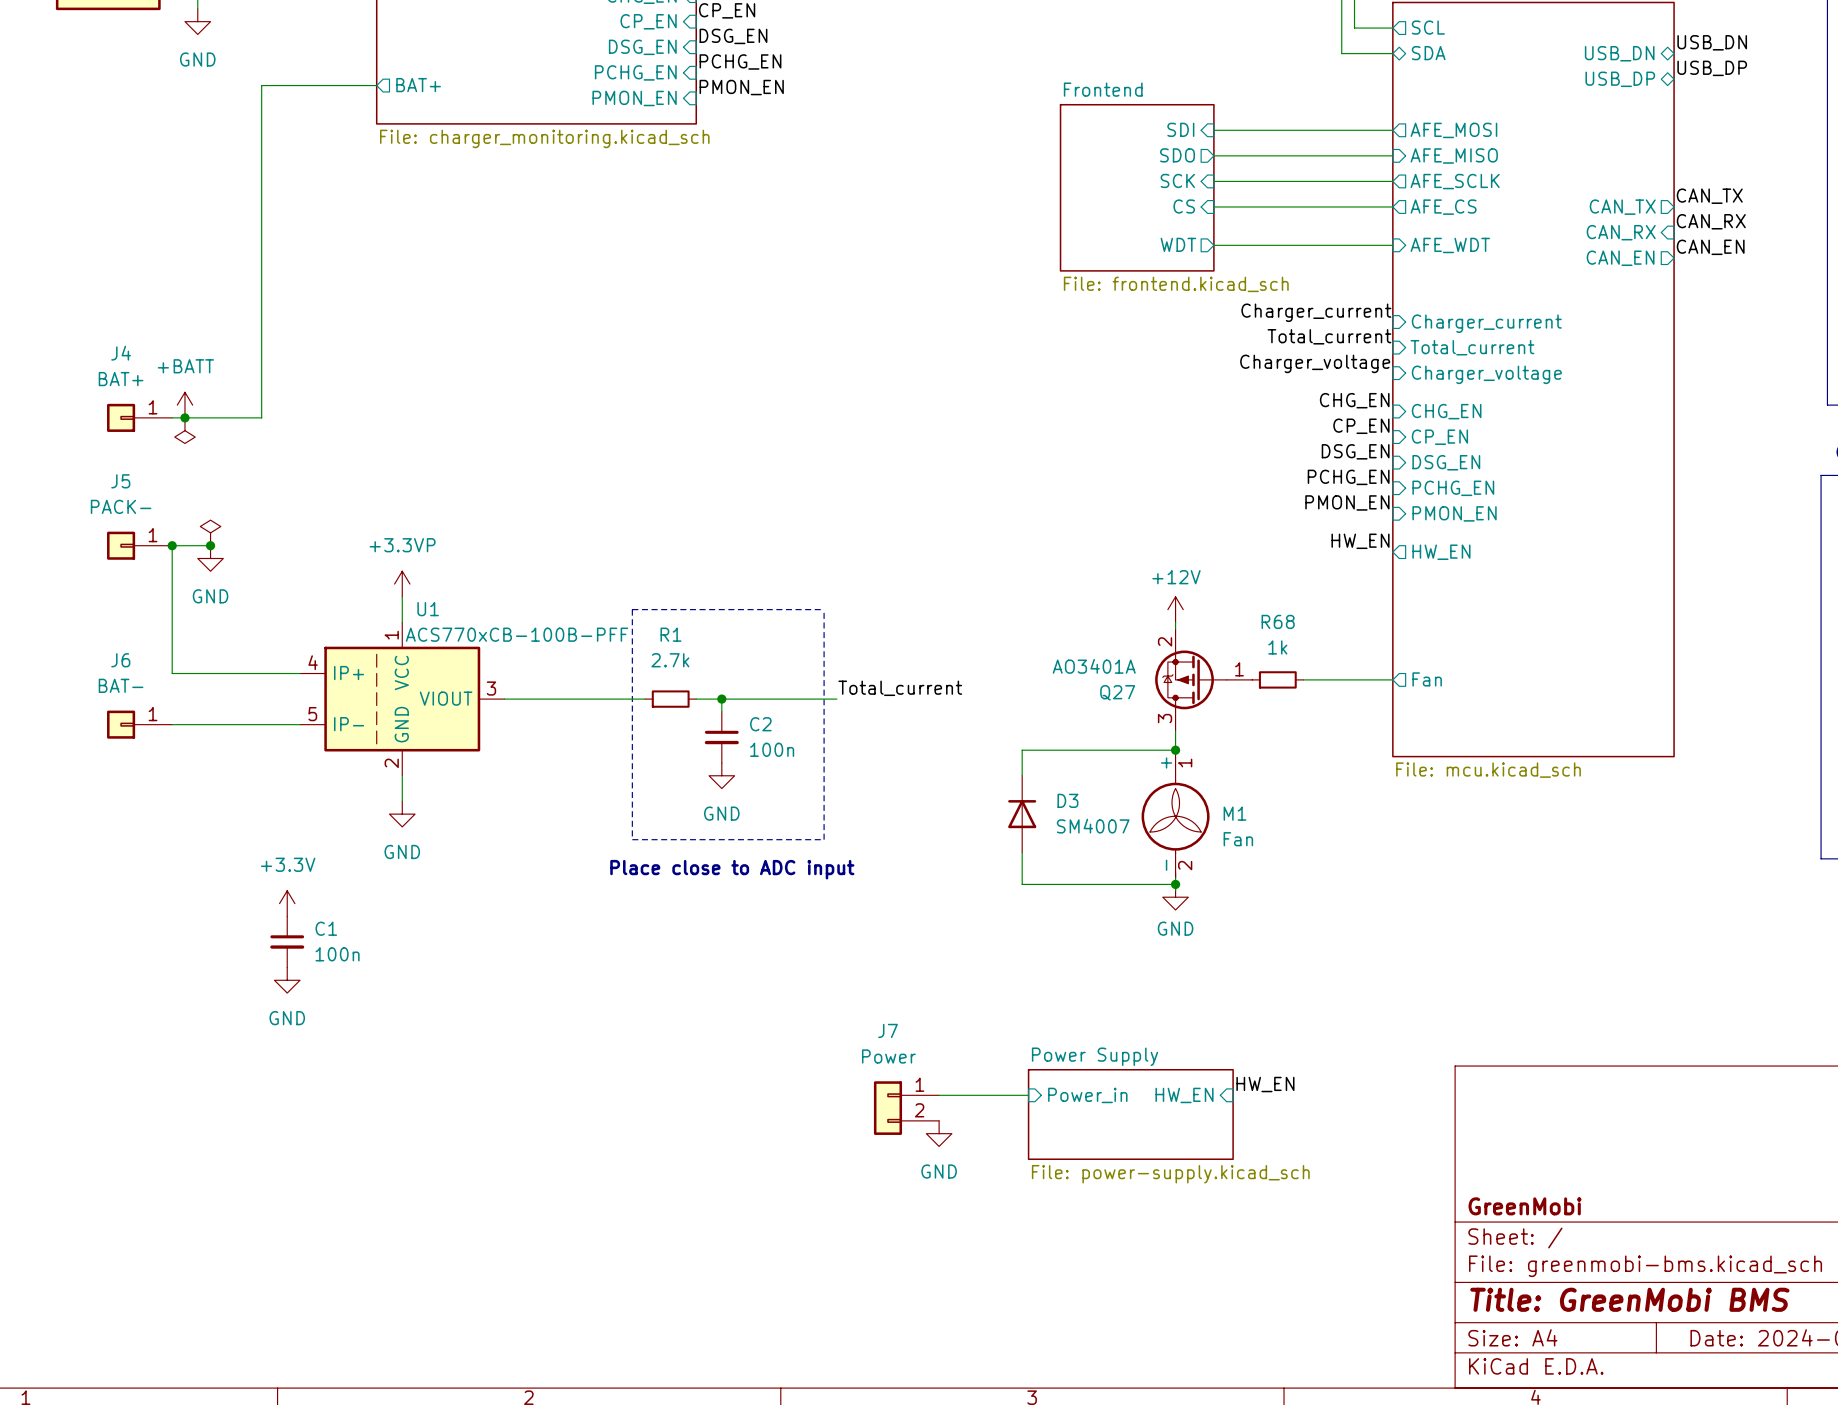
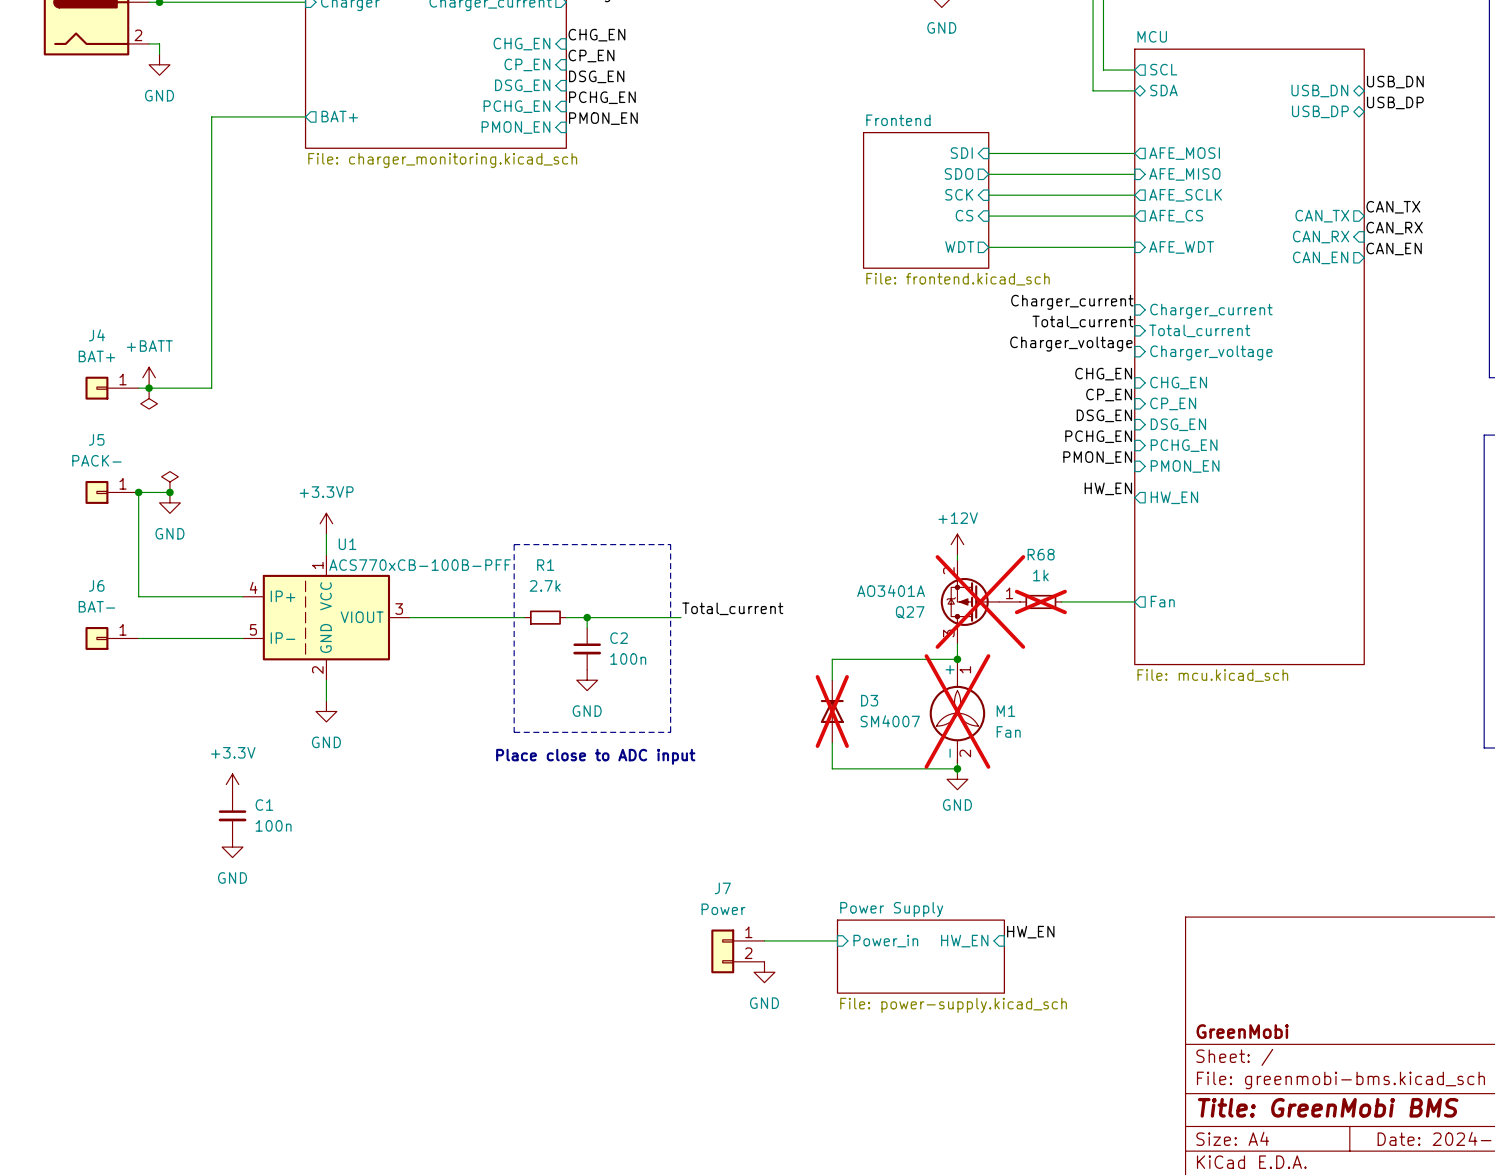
Q27 do-not-place cross: none -> (980, 601)
R68 do-not-place cross: none -> (1040, 601)
D3 do-not-place cross: none -> (832, 711)
M1 do-not-place cross: none -> (957, 711)

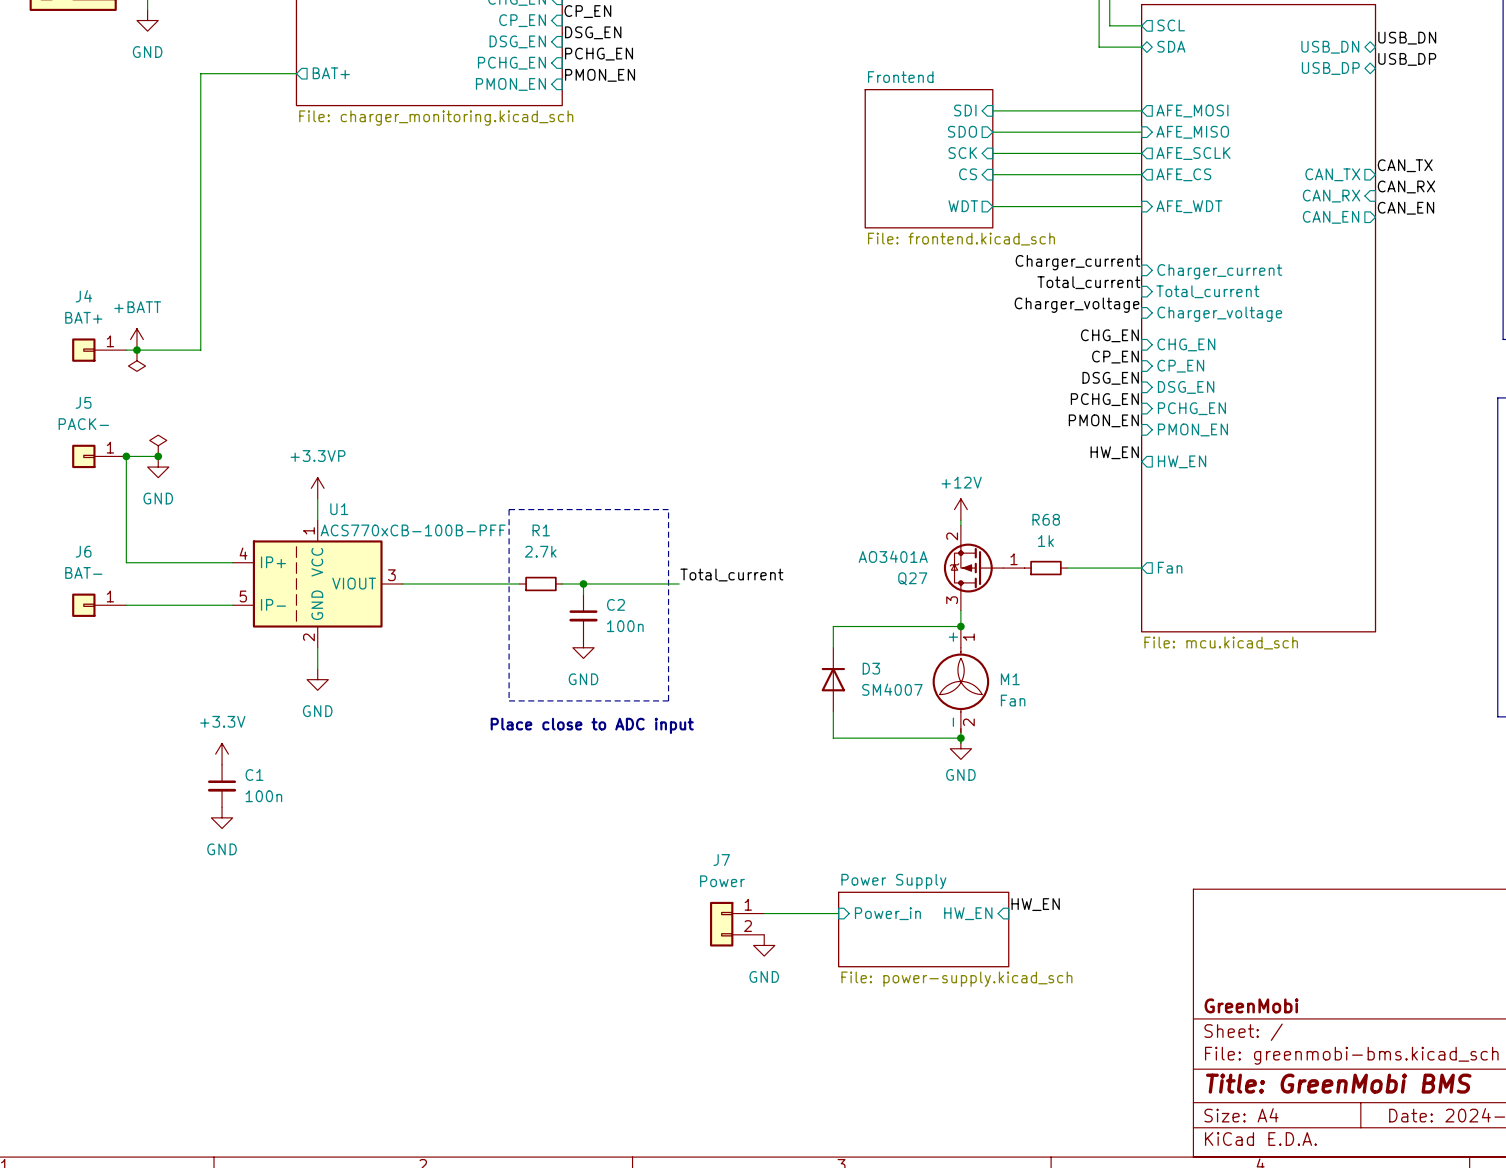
Q27 do-not-place cross: (980, 601) -> none
R68 do-not-place cross: (1040, 601) -> none
D3 do-not-place cross: (832, 711) -> none
M1 do-not-place cross: (957, 711) -> none

